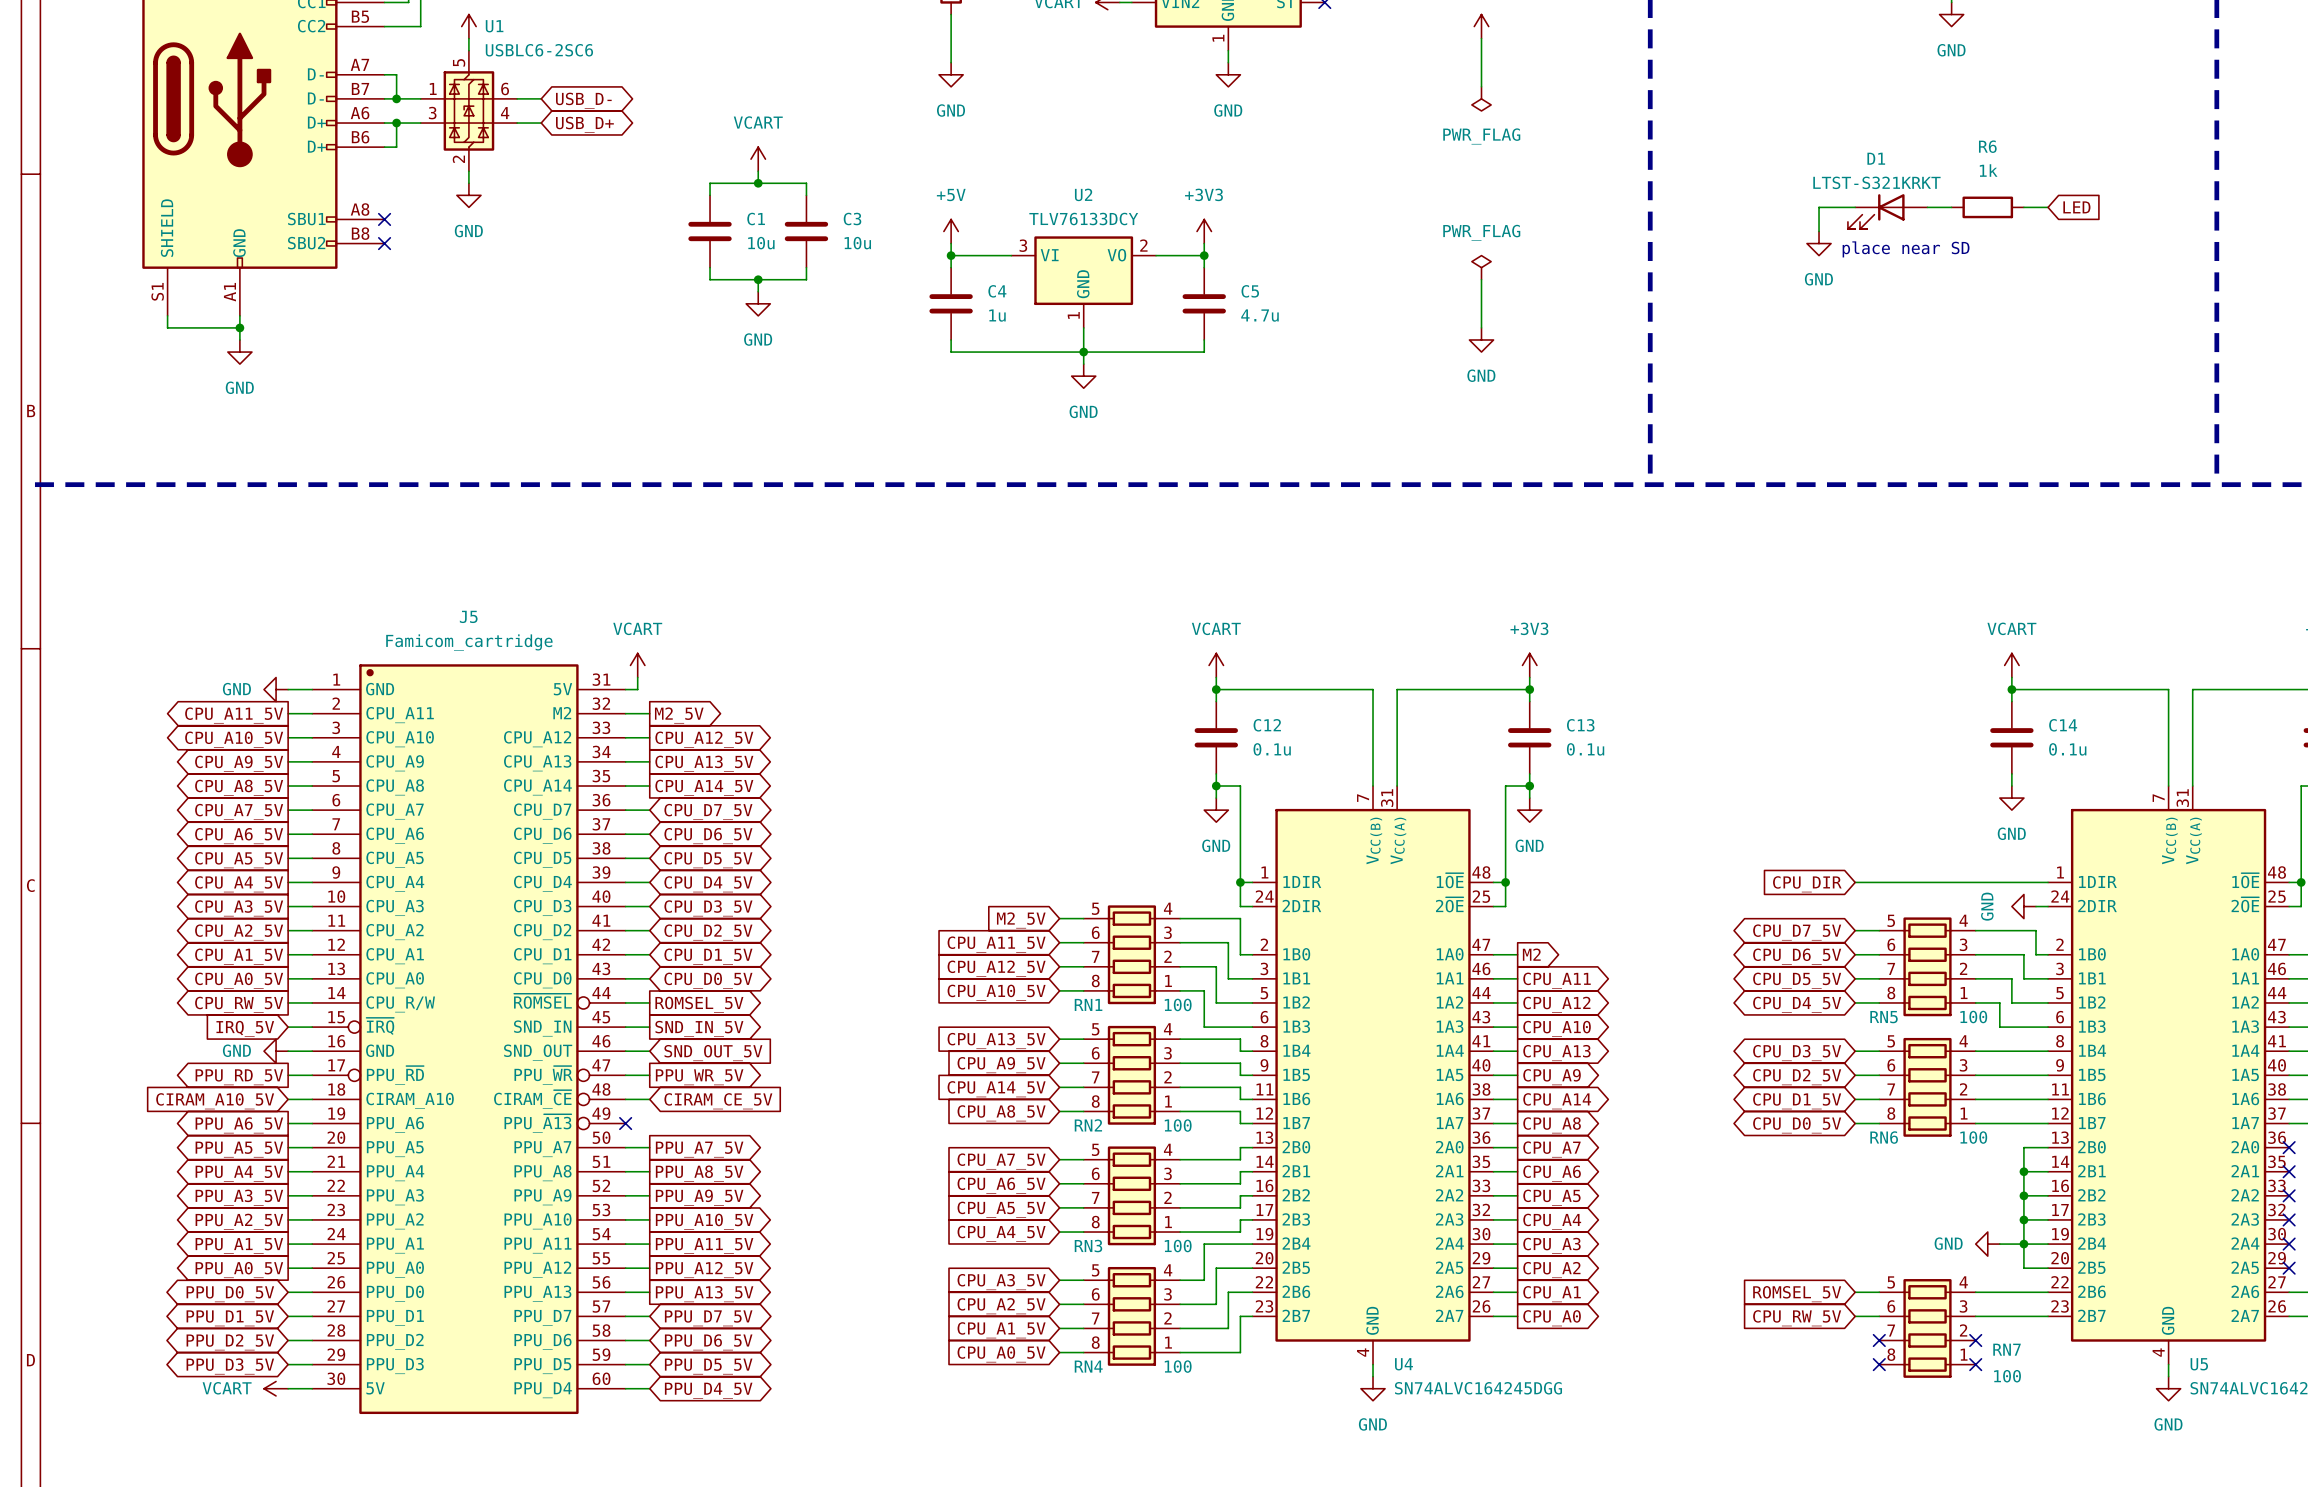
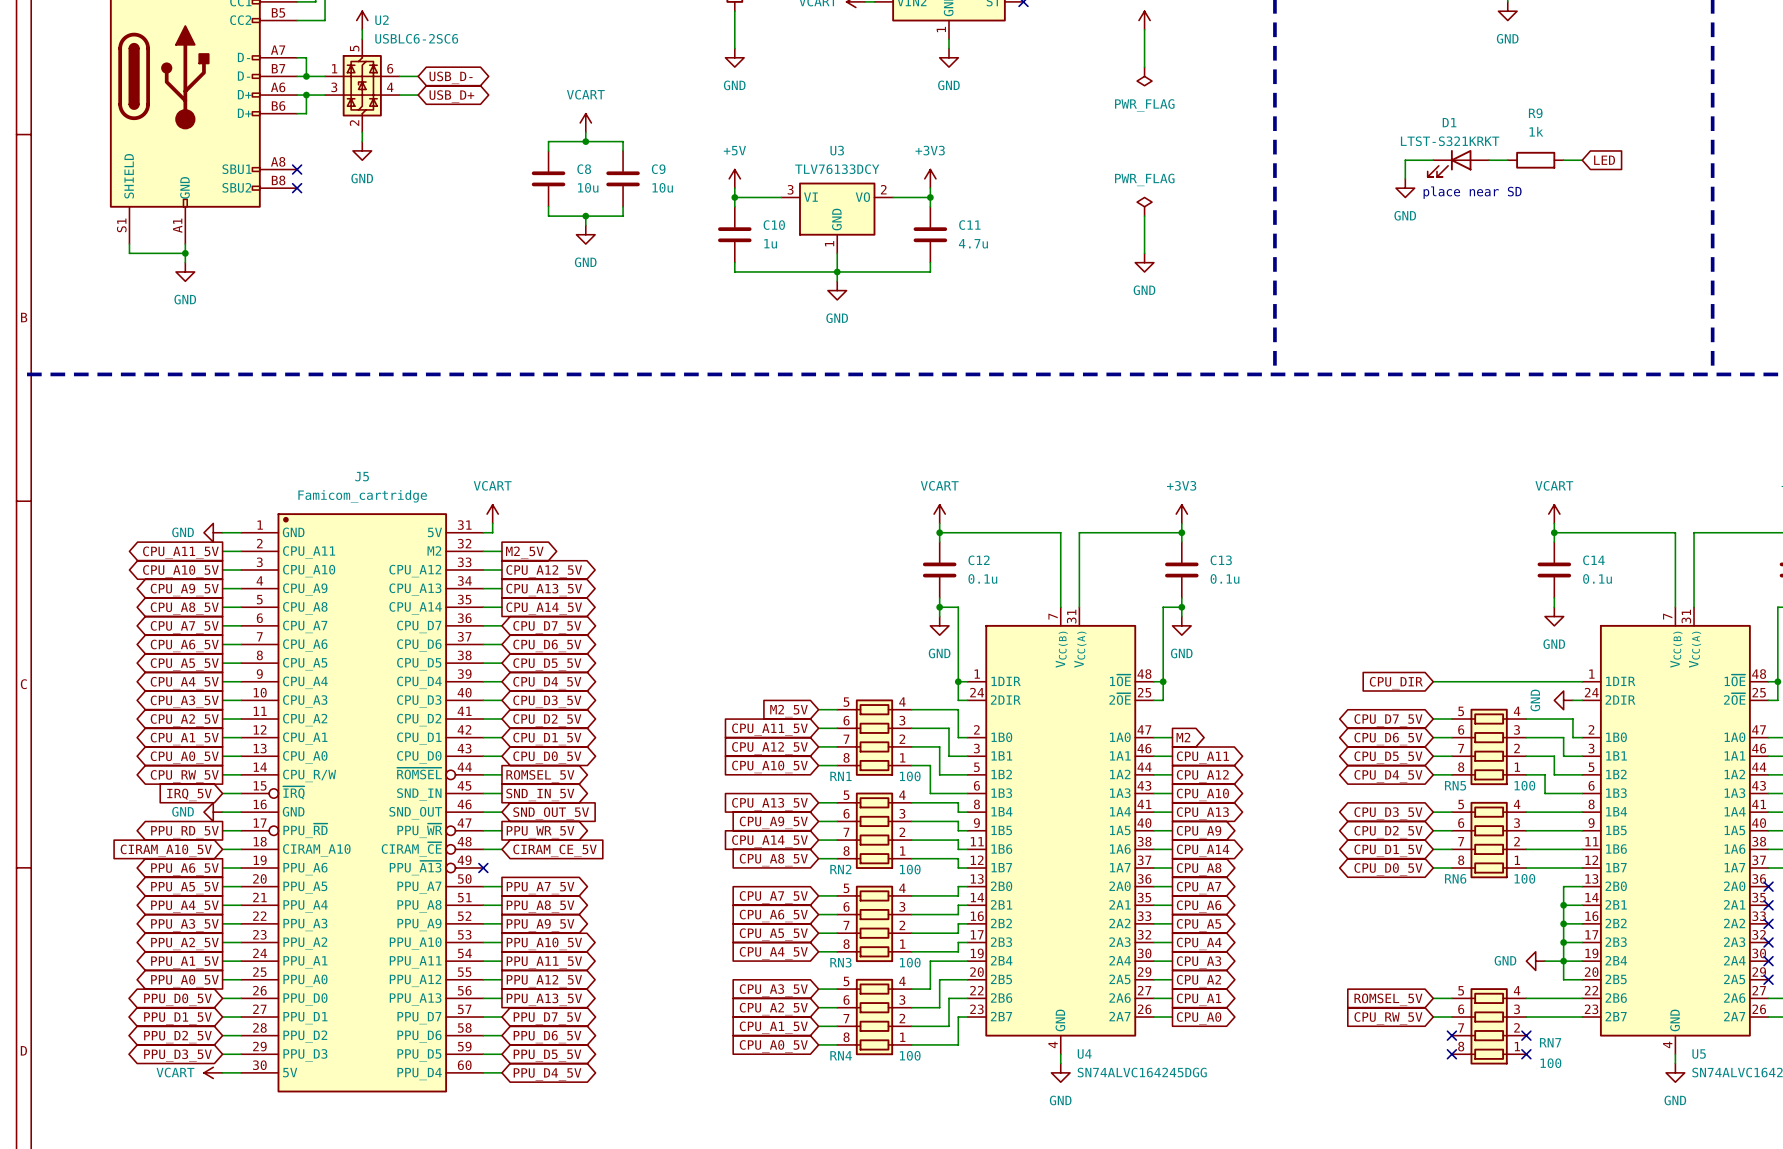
U1 name: U1 (494, 26) -> U2 (382, 20)
R6 name: R6 (1987, 146) -> R9 (1535, 113)
U2 name: U2 (1083, 194) -> U3 (837, 150)
C1 name: C1 (756, 219) -> C8 (584, 169)
C3 name: C3 (852, 219) -> C9 (658, 169)
C4 name: C4 (997, 291) -> C10 (774, 225)
C5 name: C5 (1250, 291) -> C11 (969, 225)

